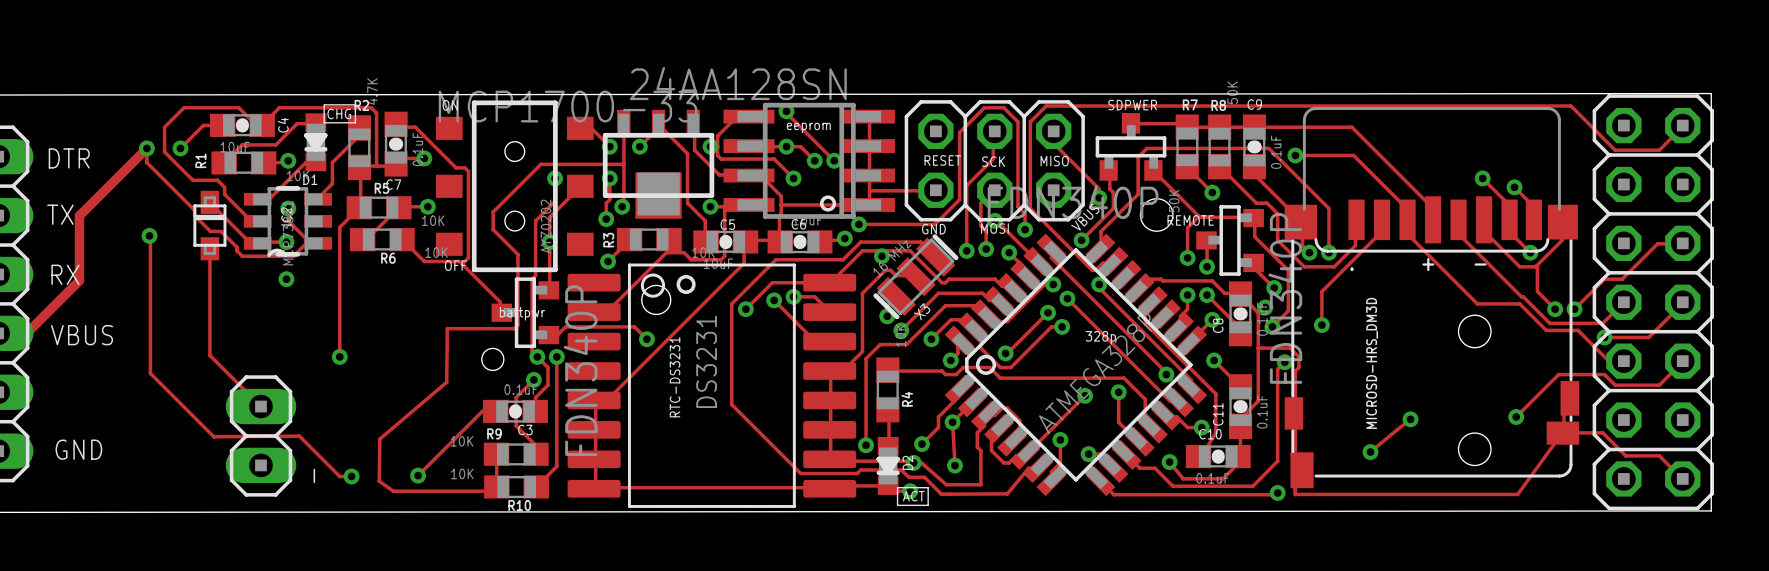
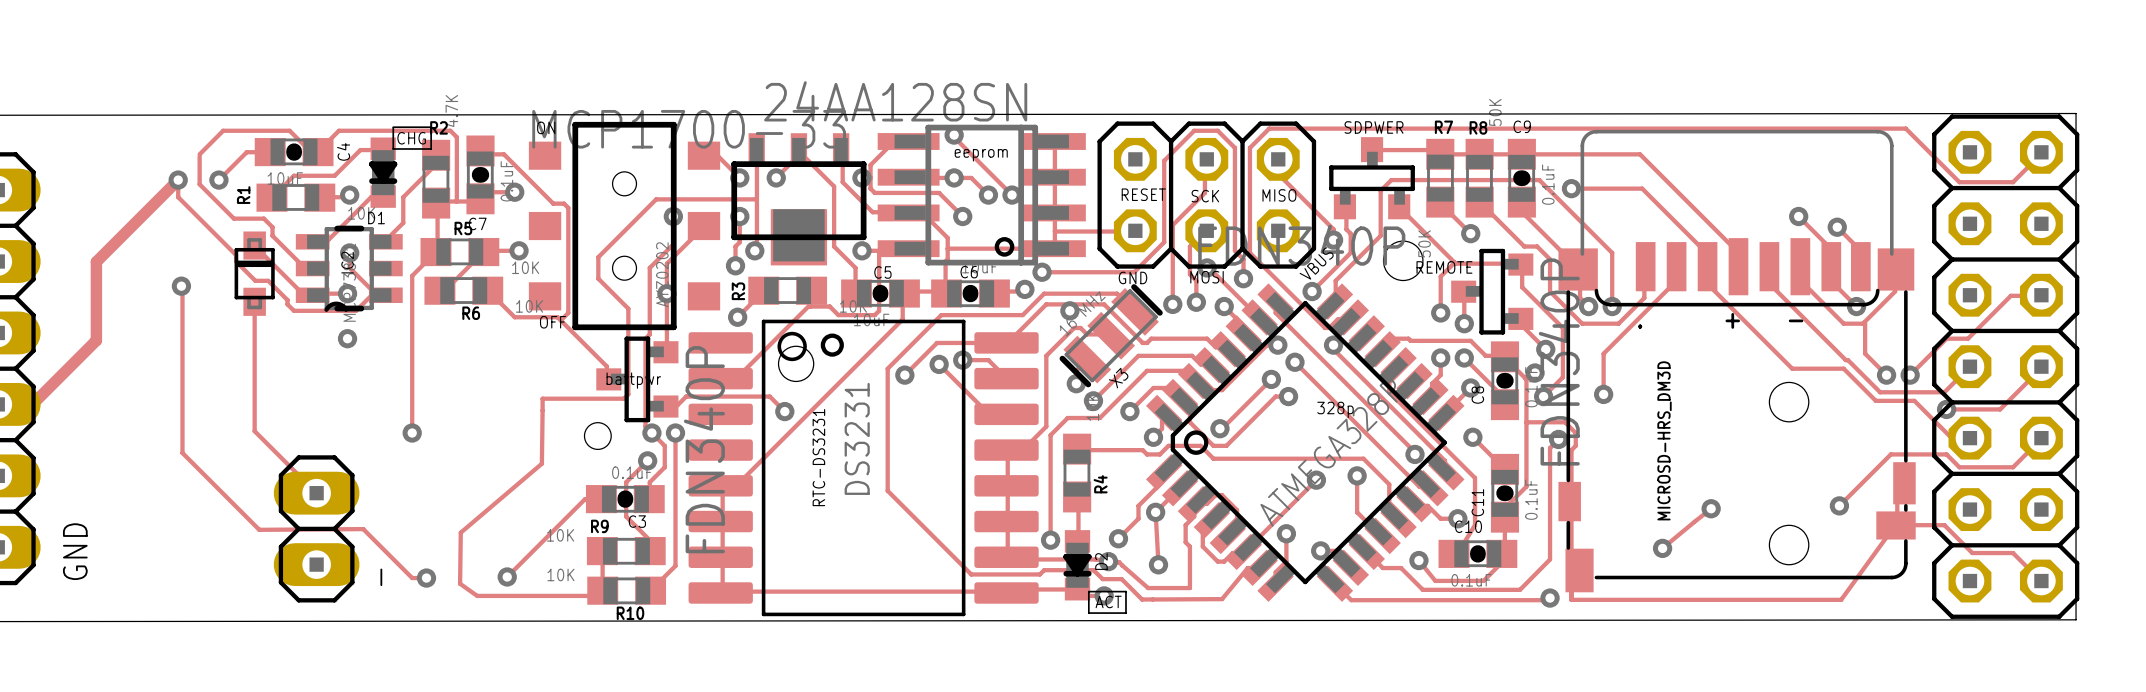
text: DTR (69, 158) -> none
text: TX (60, 214) -> none
text: RX (65, 274) -> none
text: VBUS (82, 335) -> none
text rotation: 0° (78, 449) -> 90° counterclockwise (75, 551)

